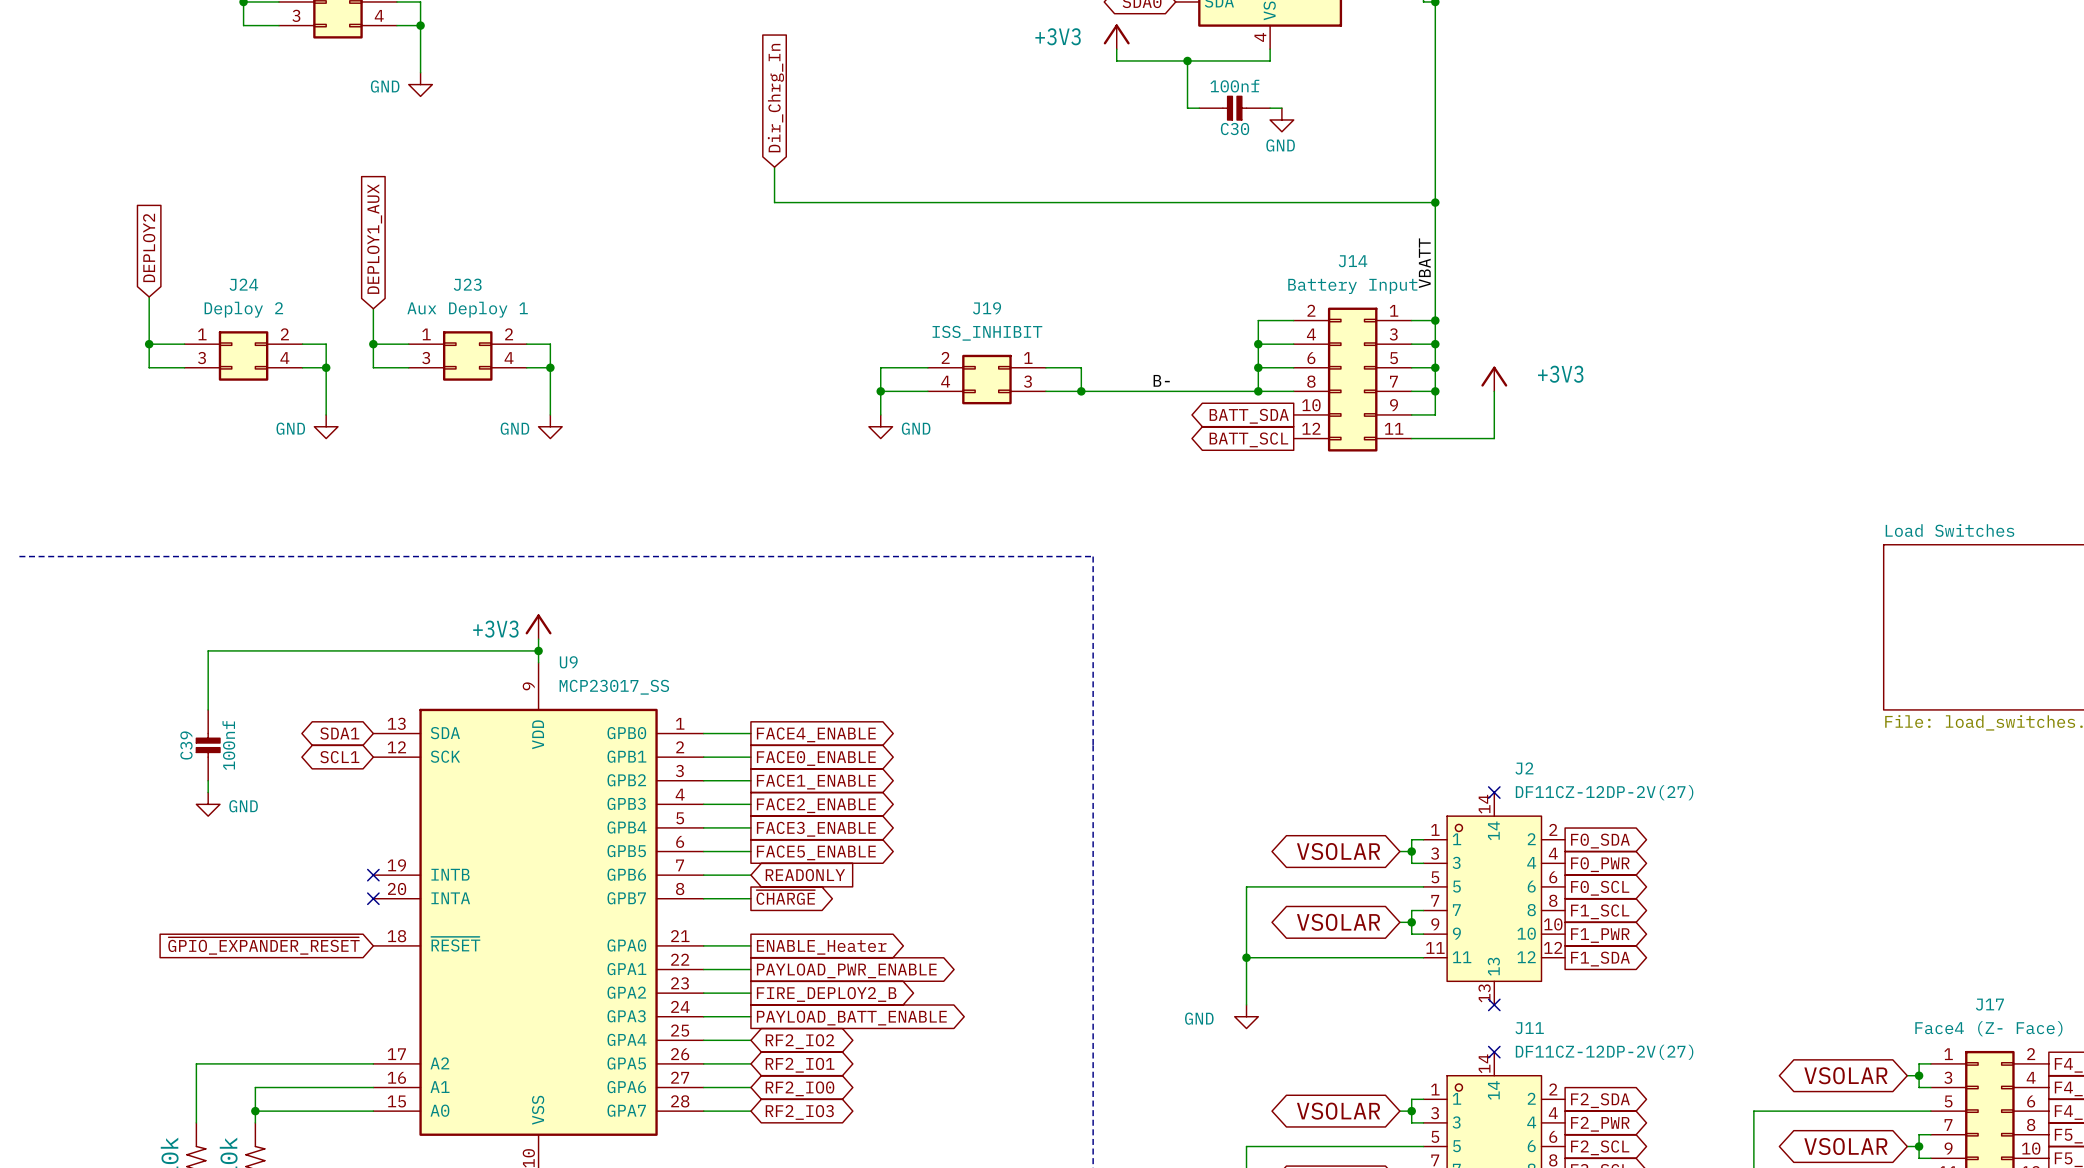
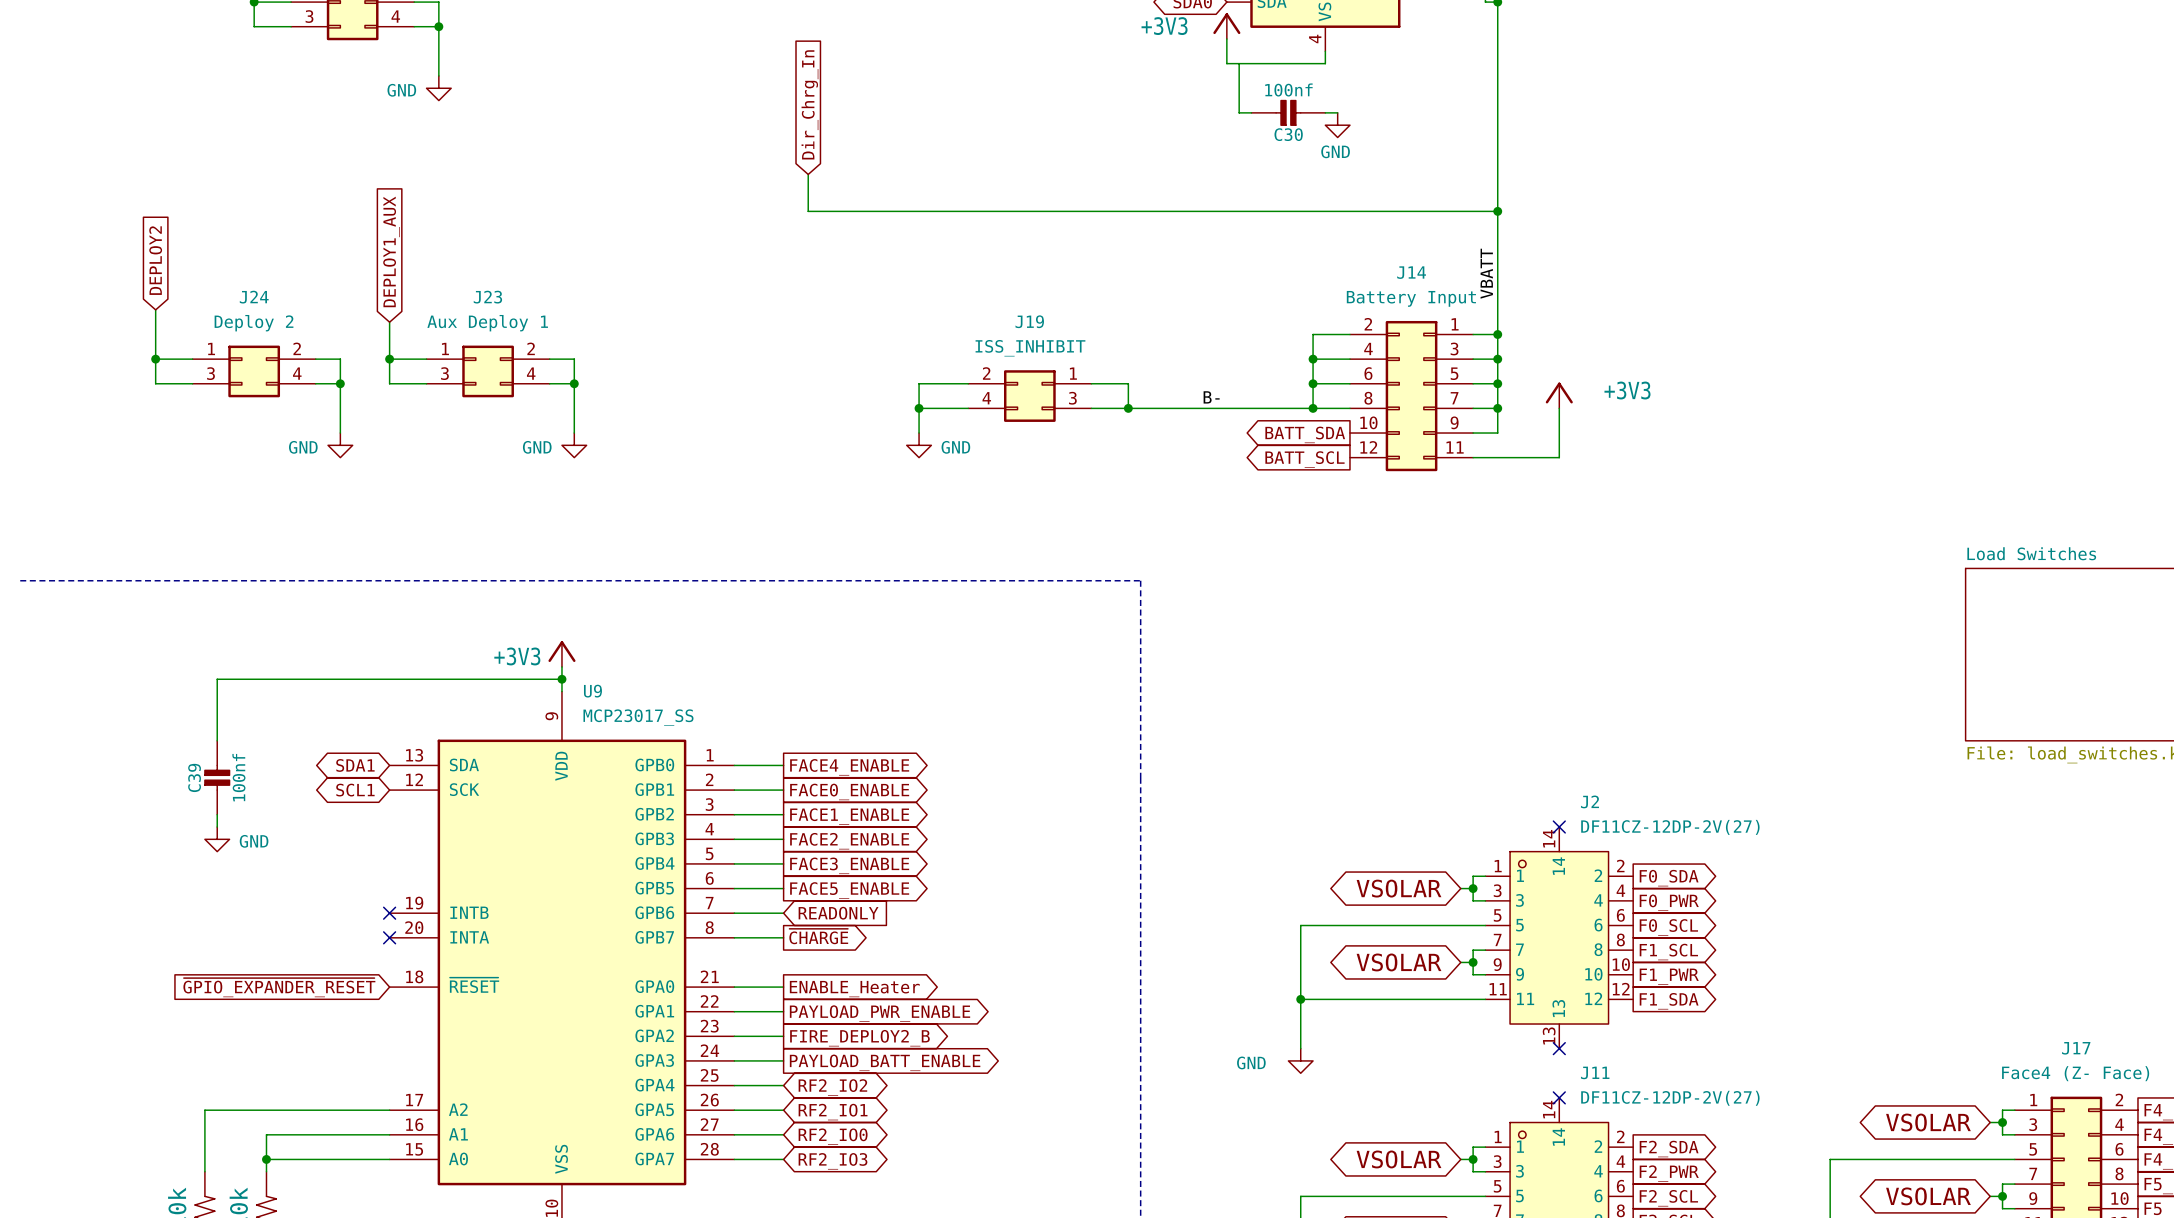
power symbol position: +3V3 (1116, 36) -> +3V3 (1226, 26)
wire: (1116, 49) (1116, 60) (1175, 60) -> (1226, 39) (1226, 63)
junction: (1187, 60) -> none

